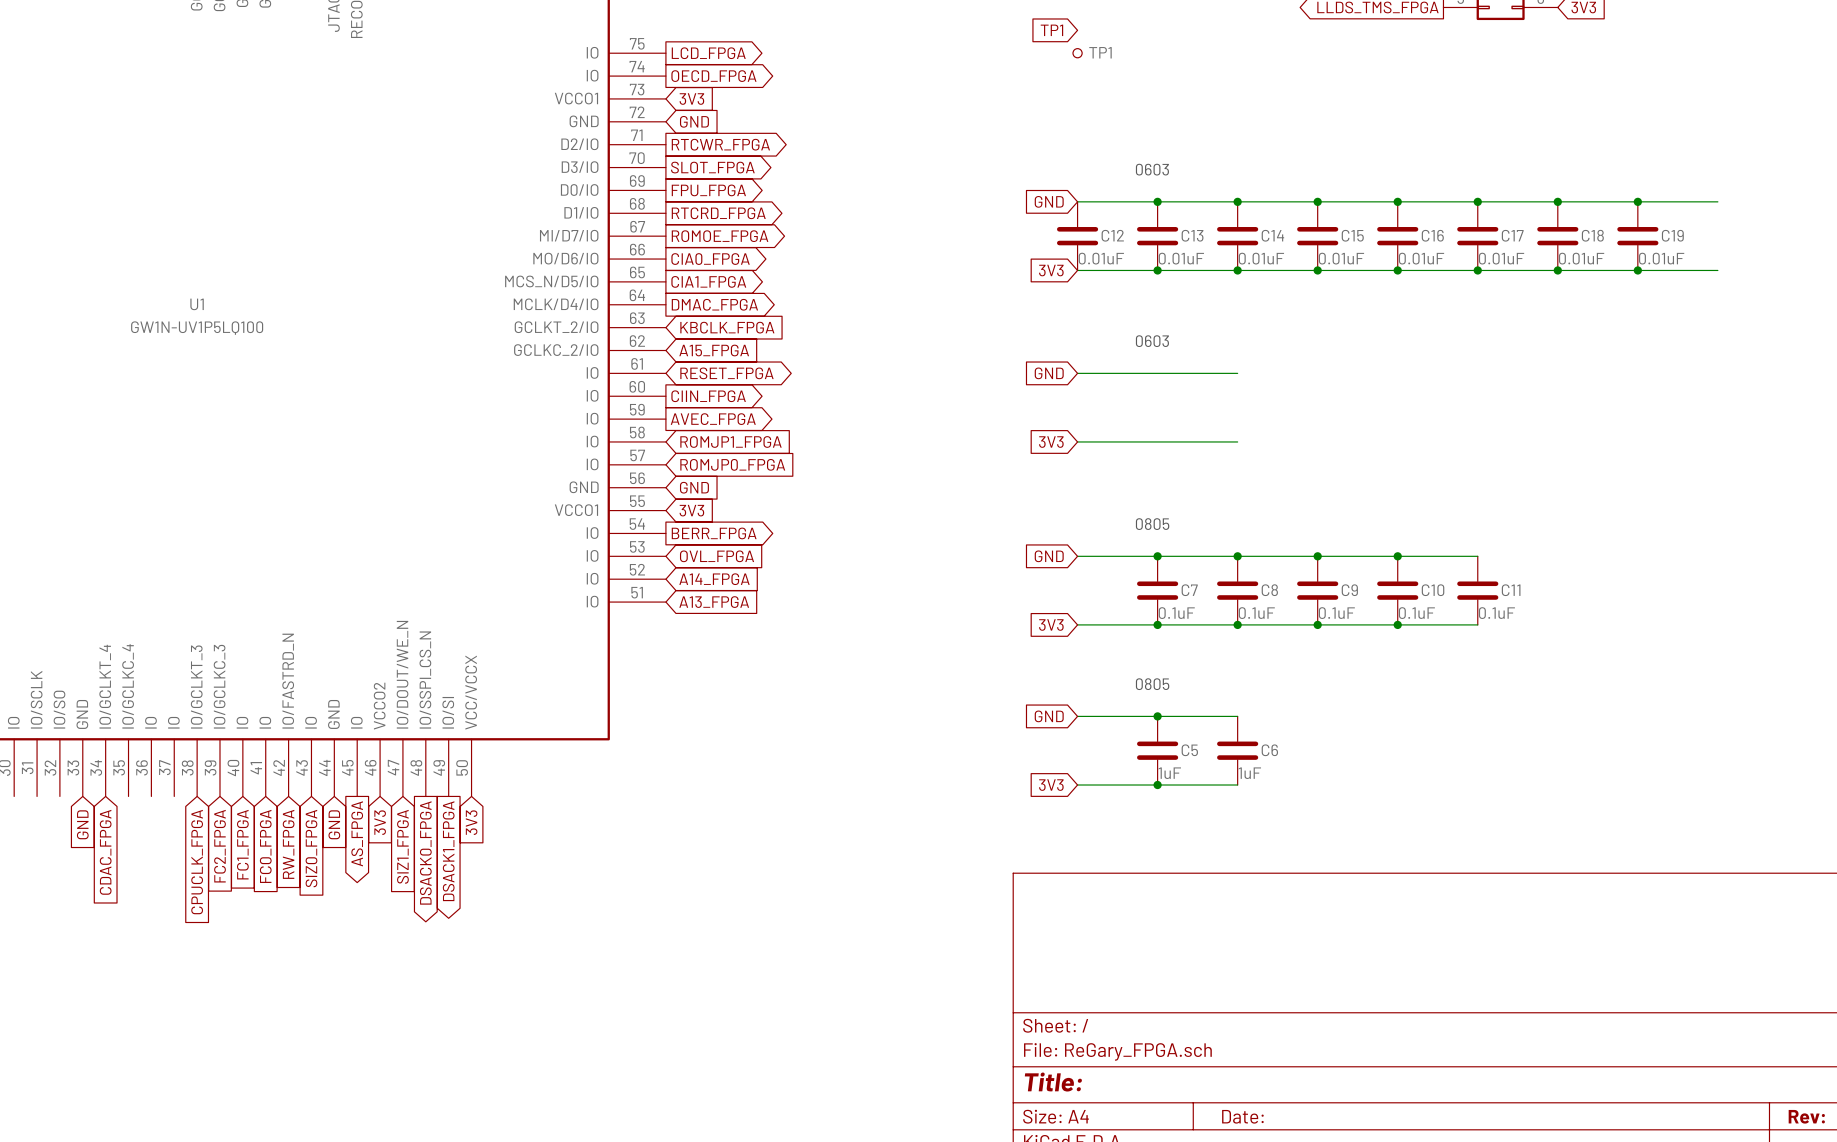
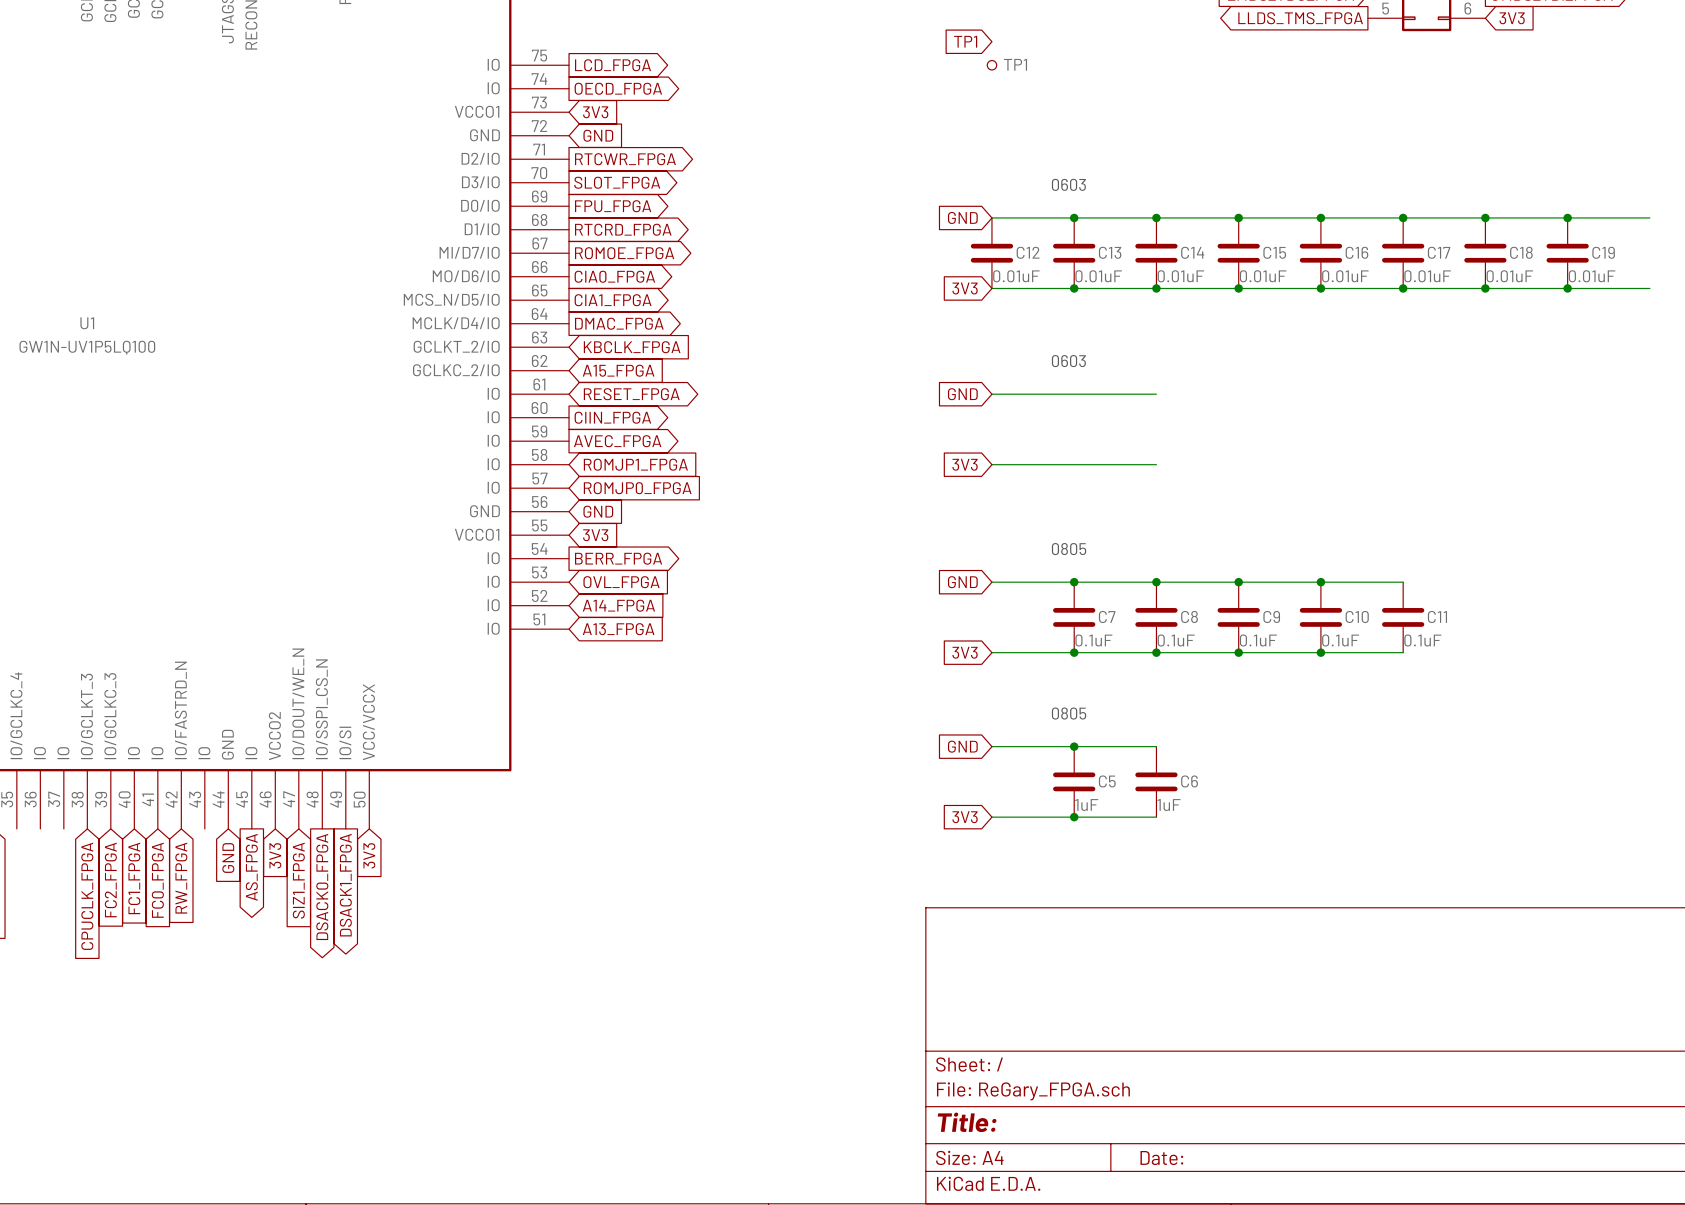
global label: SIZ0_FPGA (311, 848) -> none

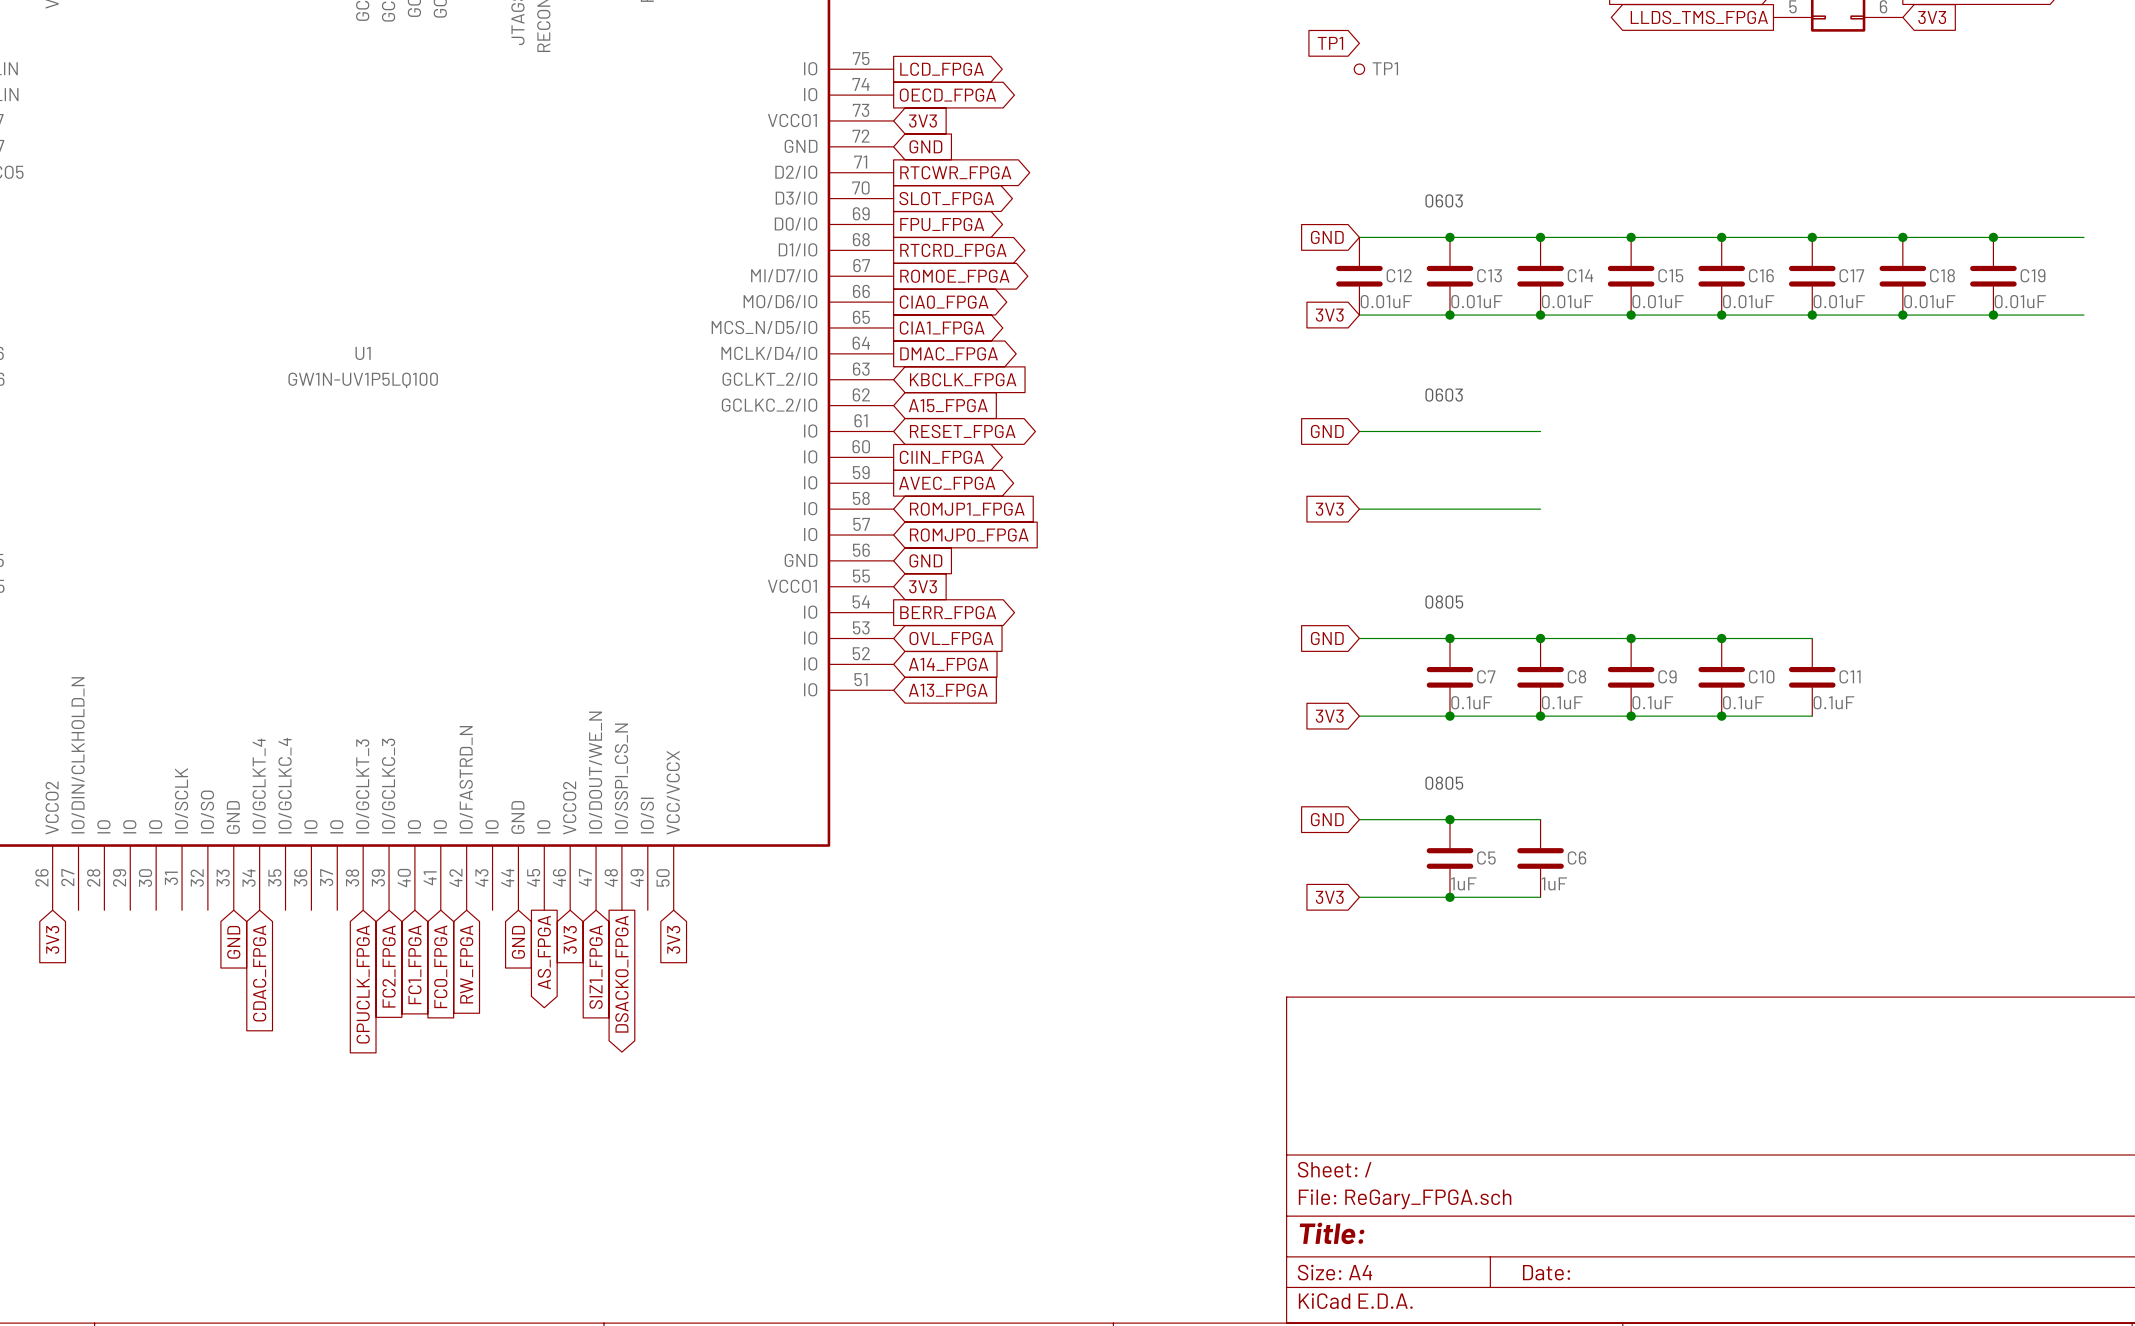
global label: DSACK1_FPGA (345, 885) -> none

